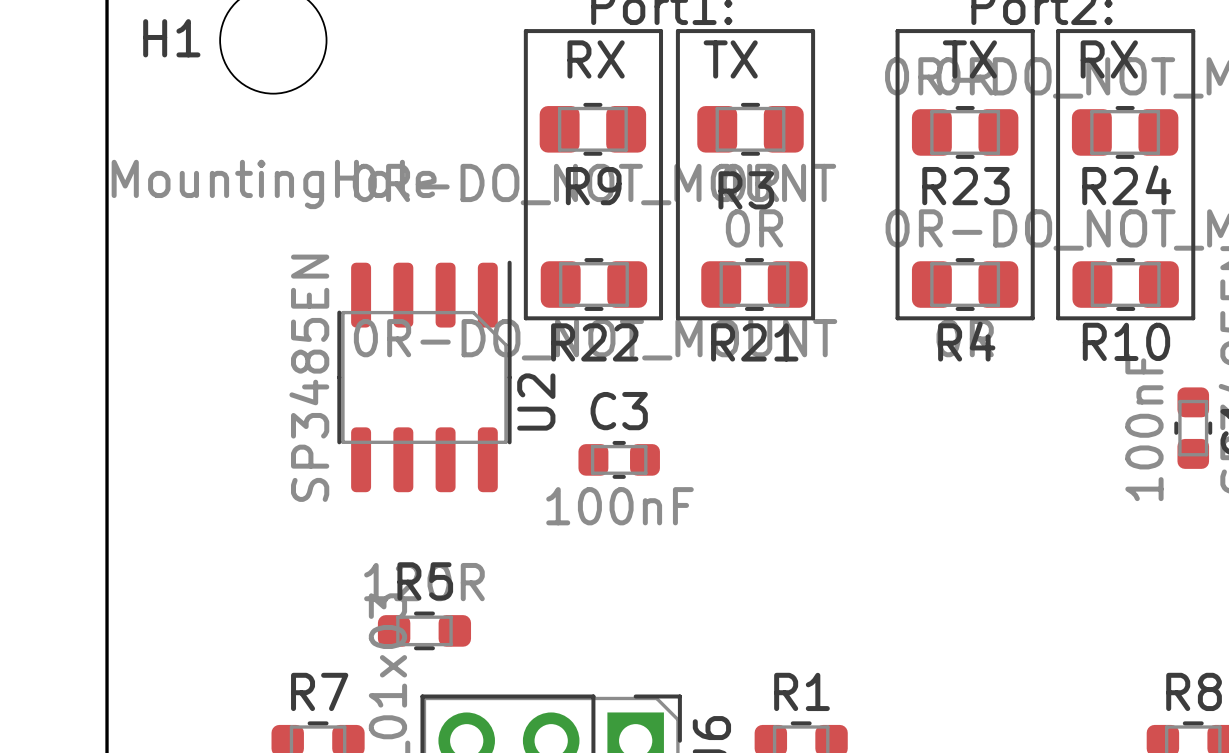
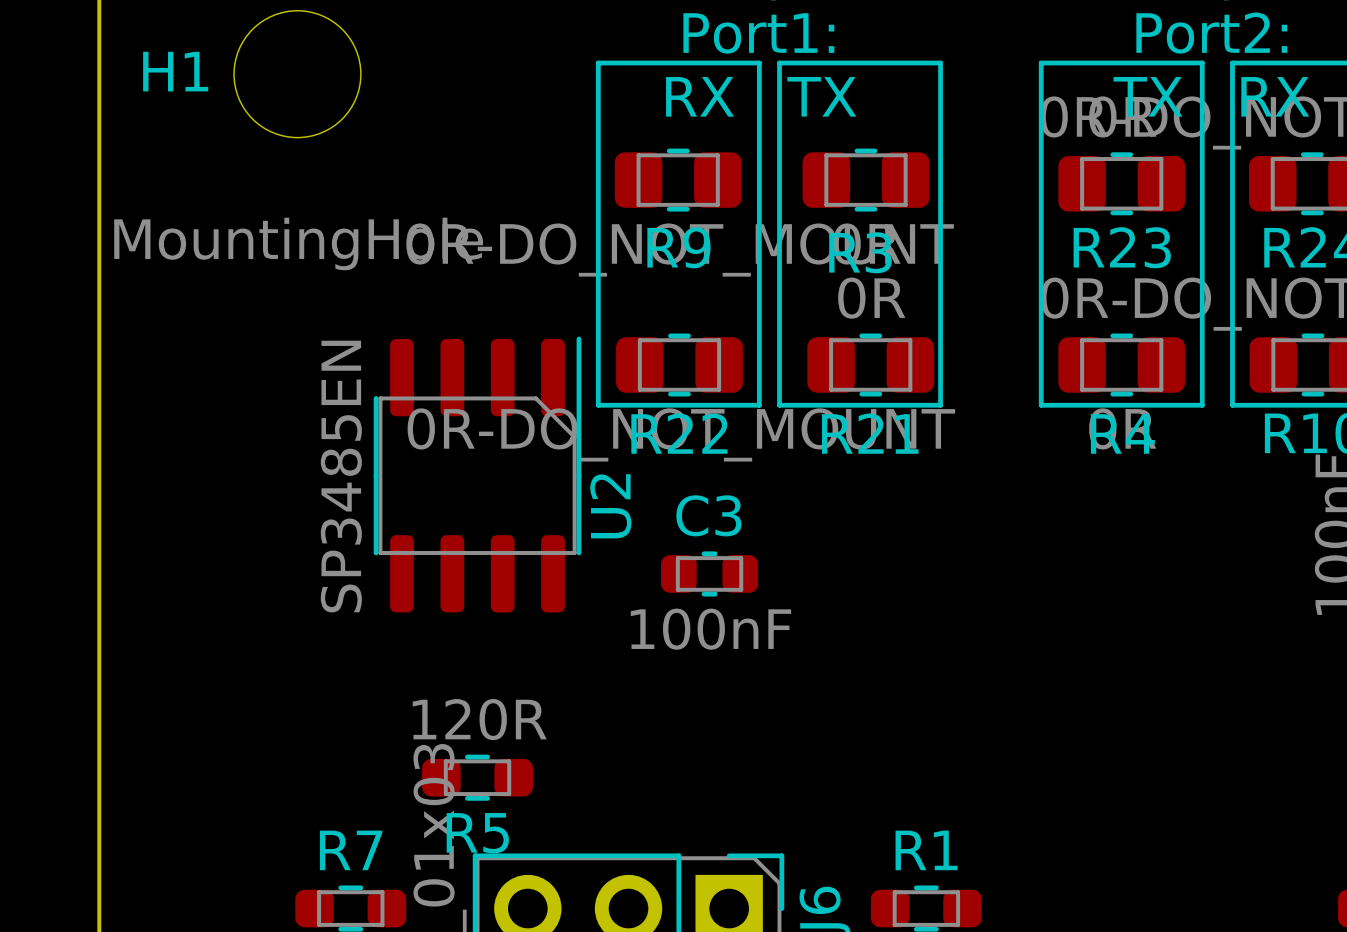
R5 name position: R5 (425, 581) -> R5 (477, 833)

